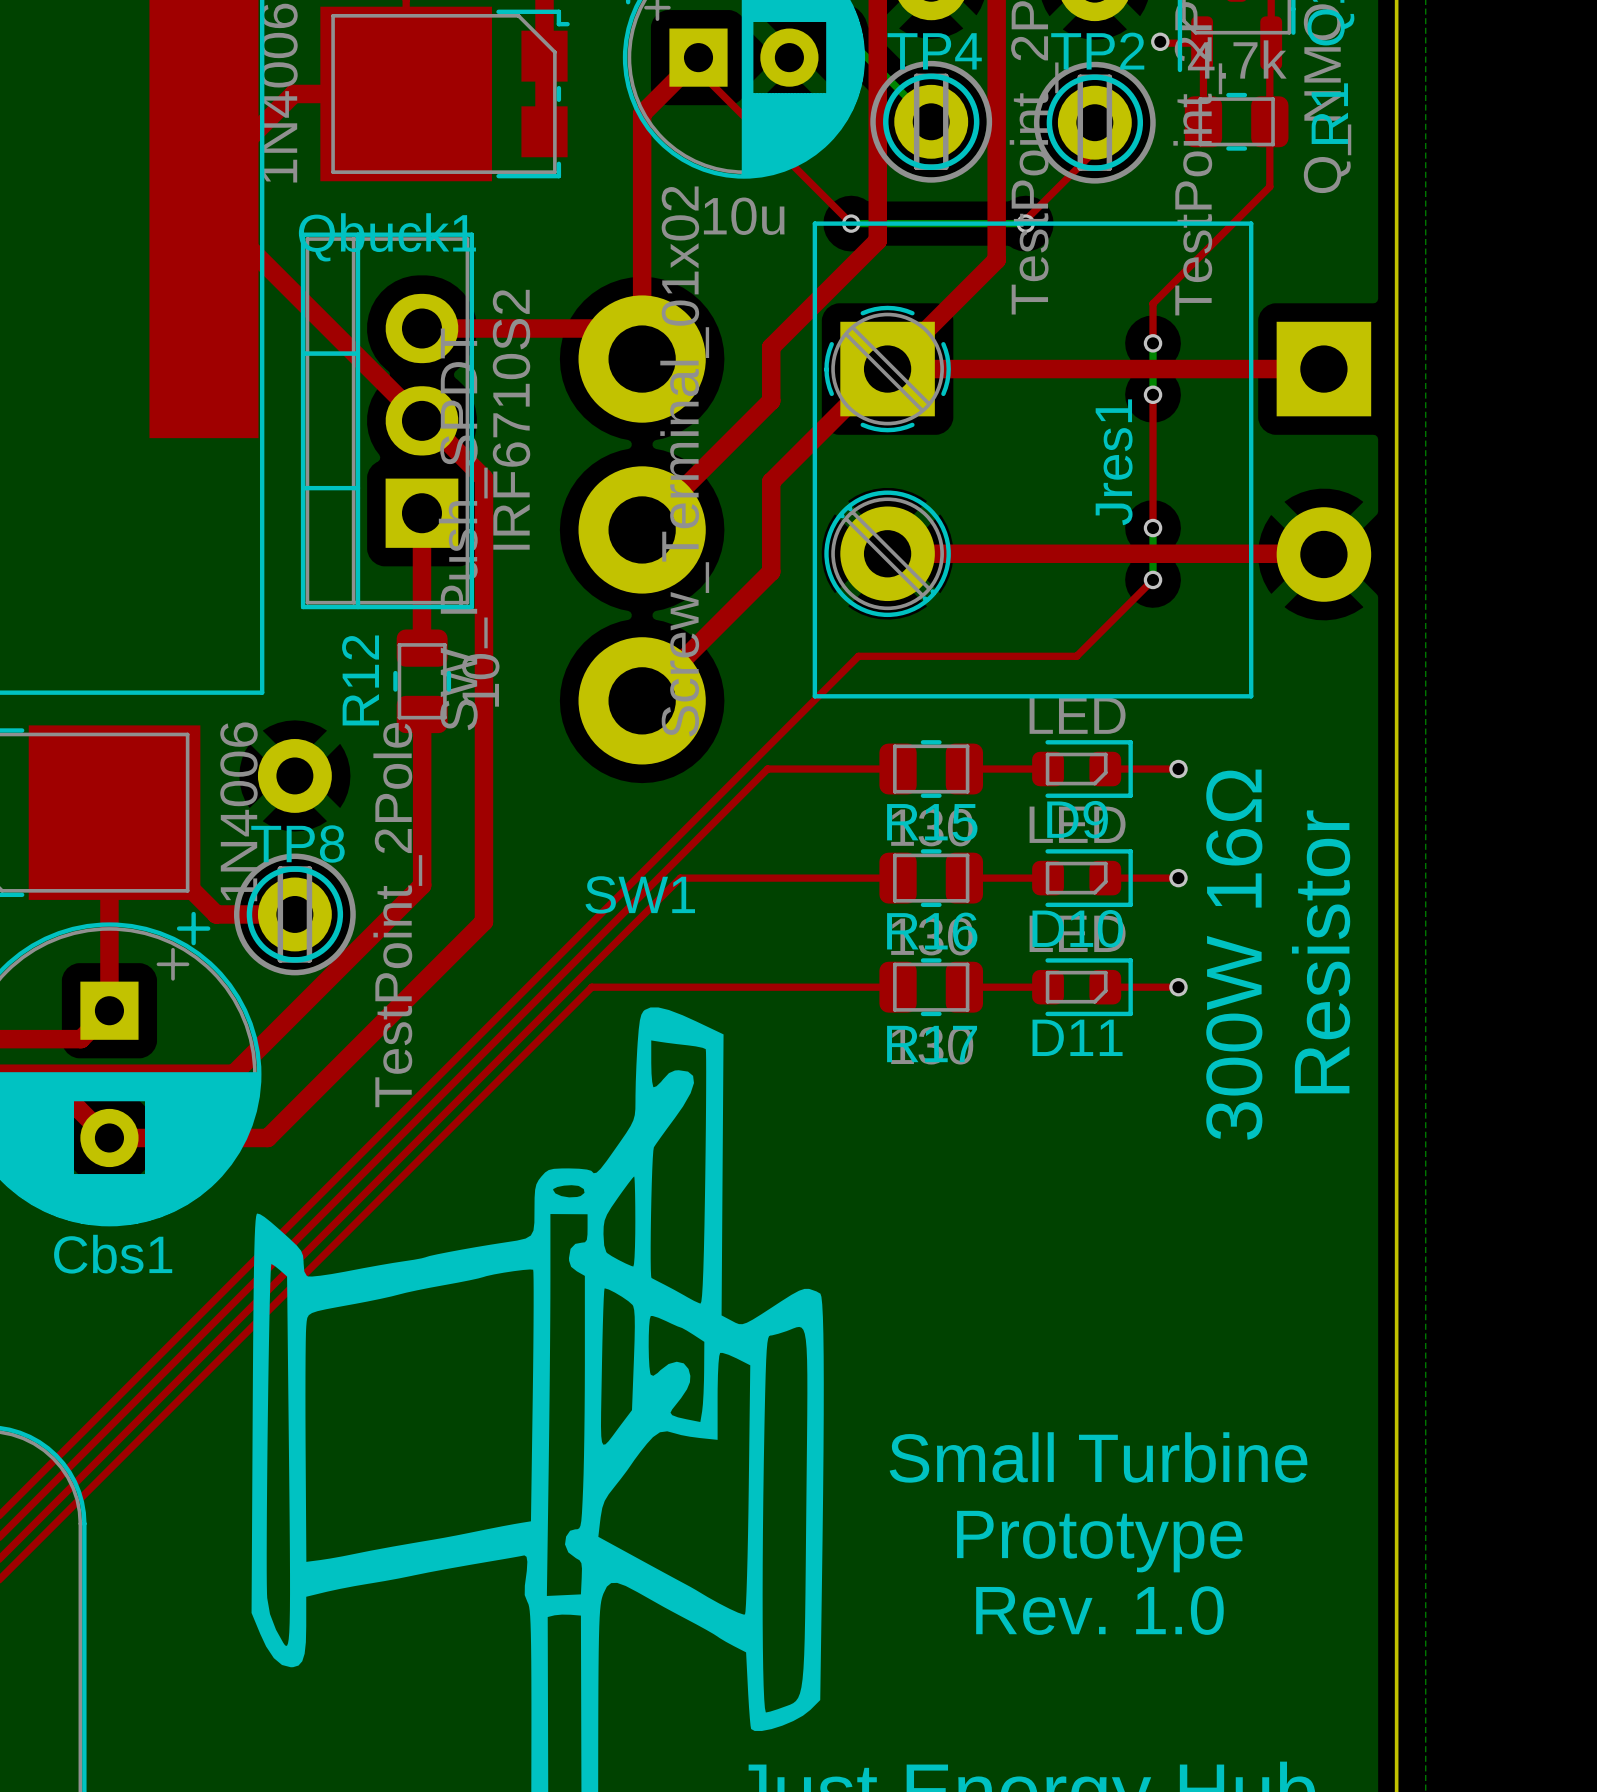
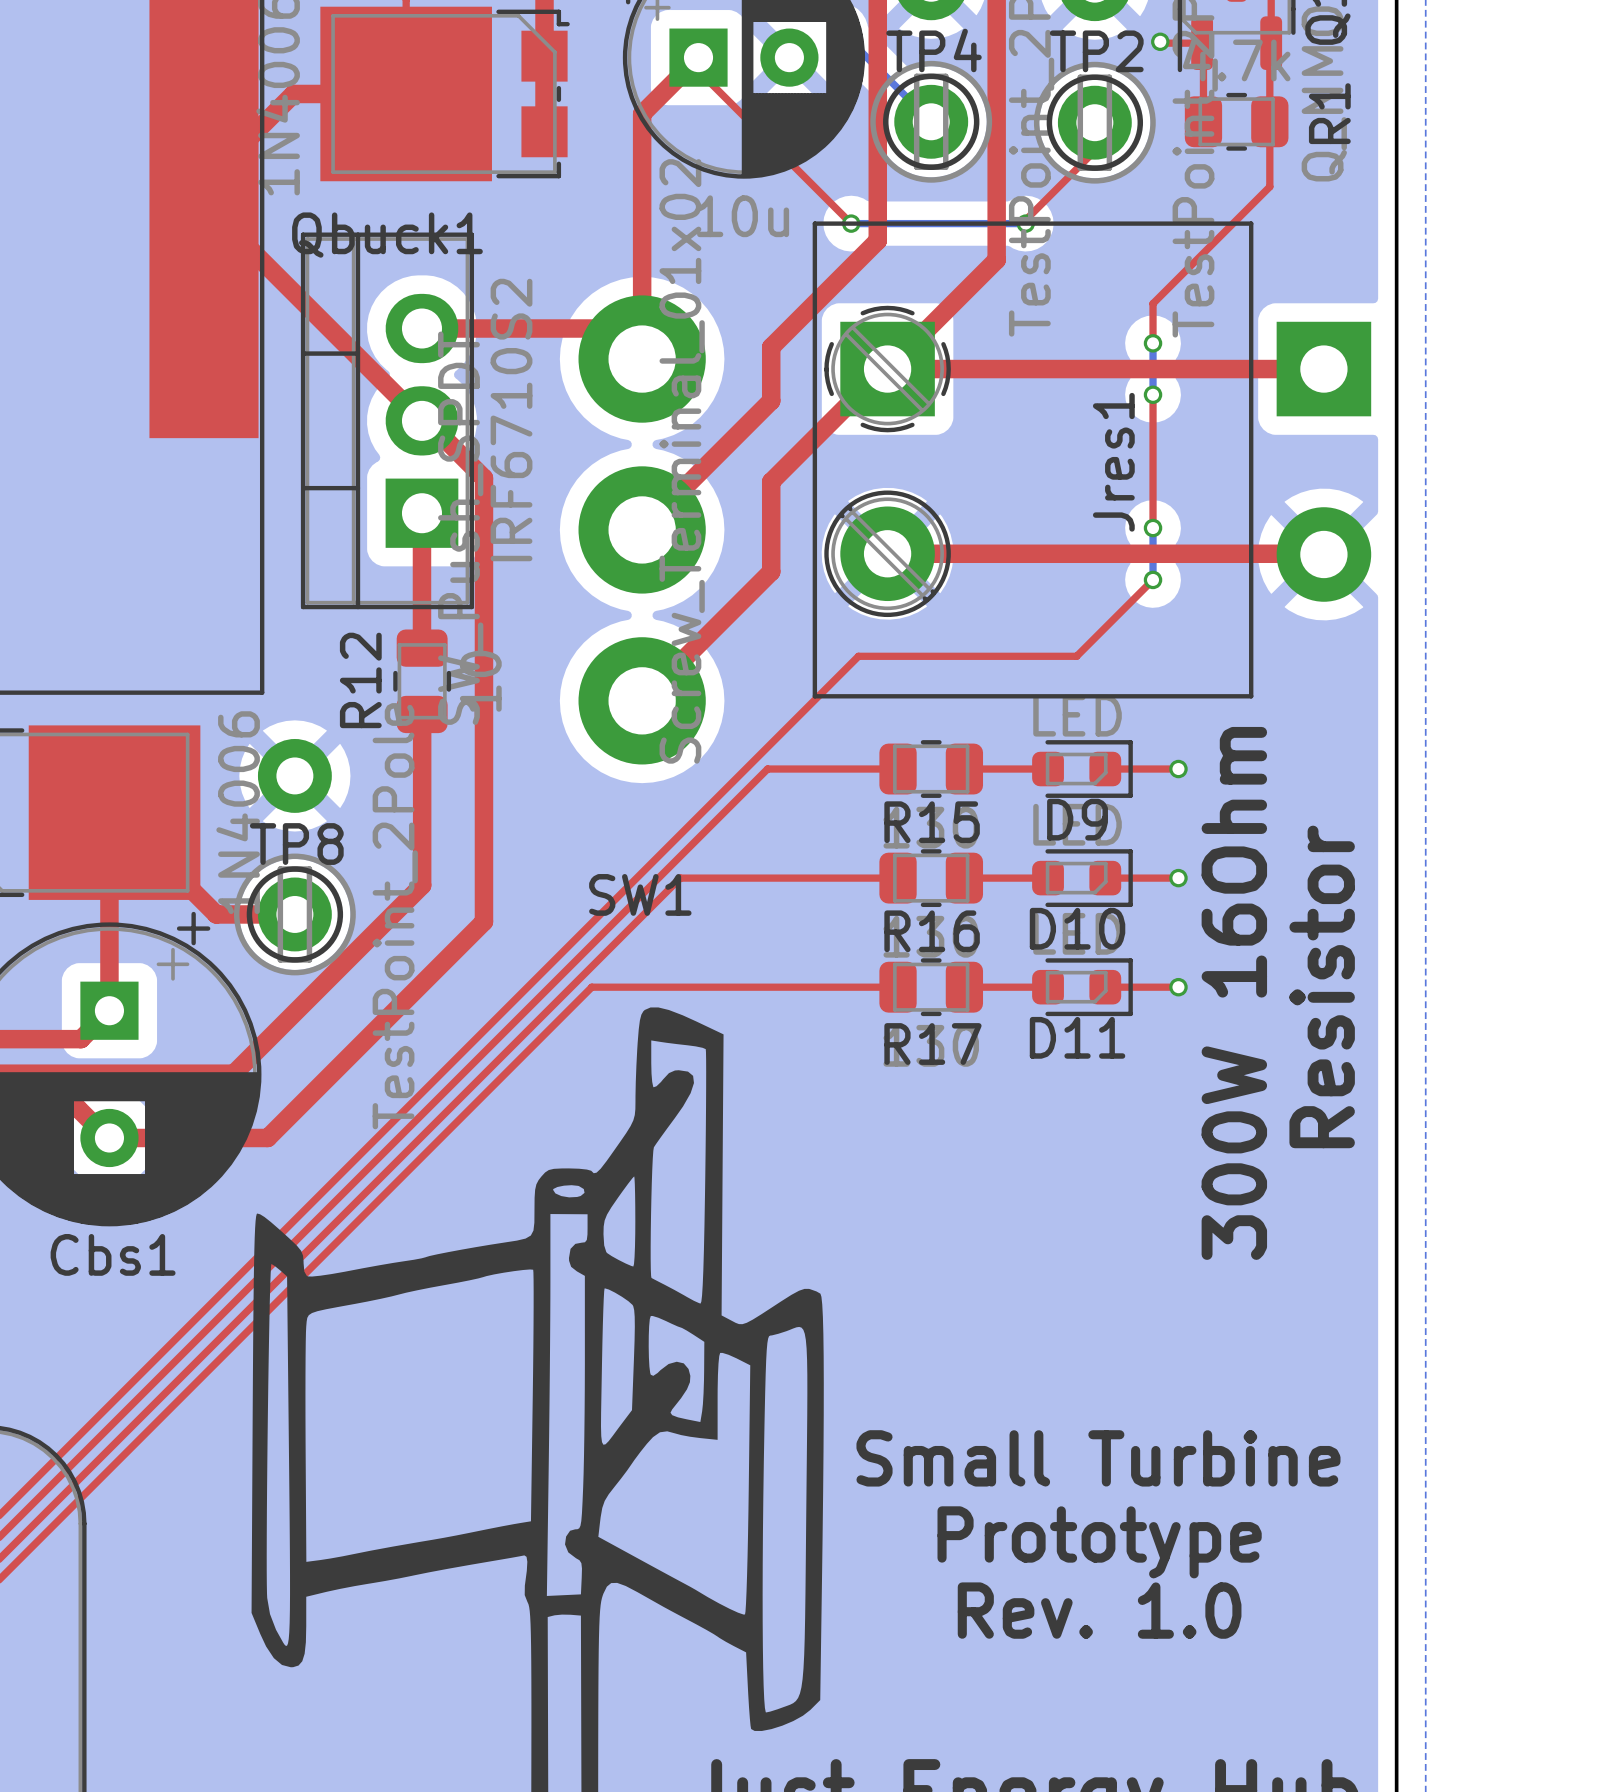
text position: Resistor (1321, 951) -> Resistor (1322, 986)
text: 300W 16Ω (1234, 954) -> 300W 16Ohm (1234, 993)

